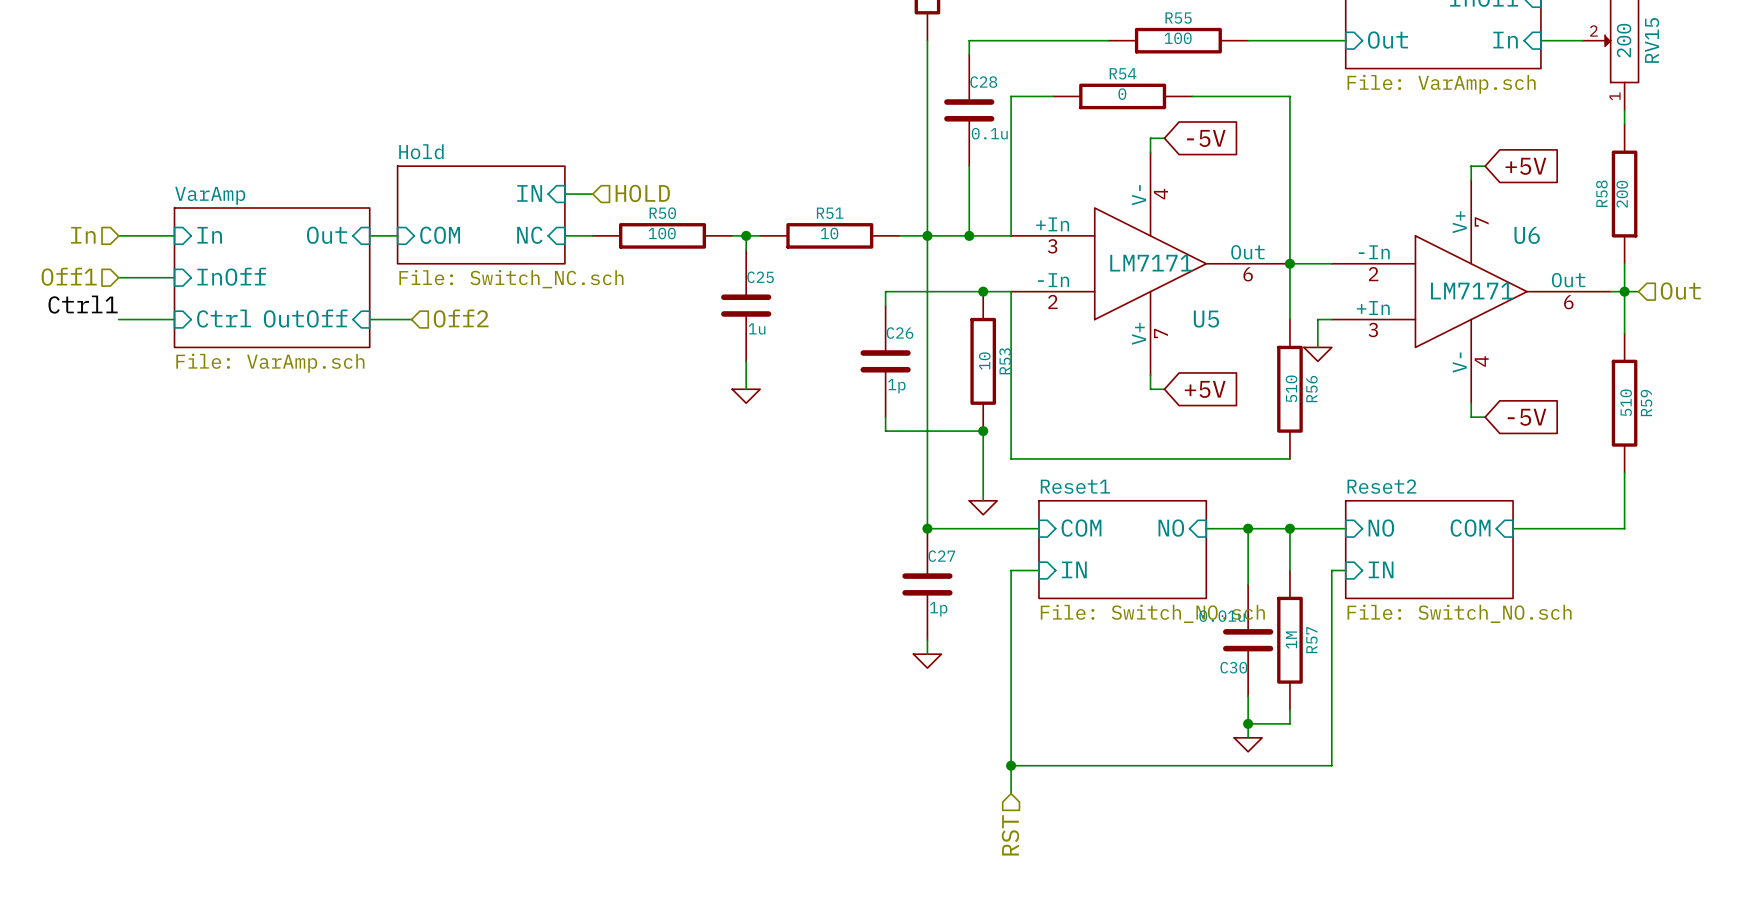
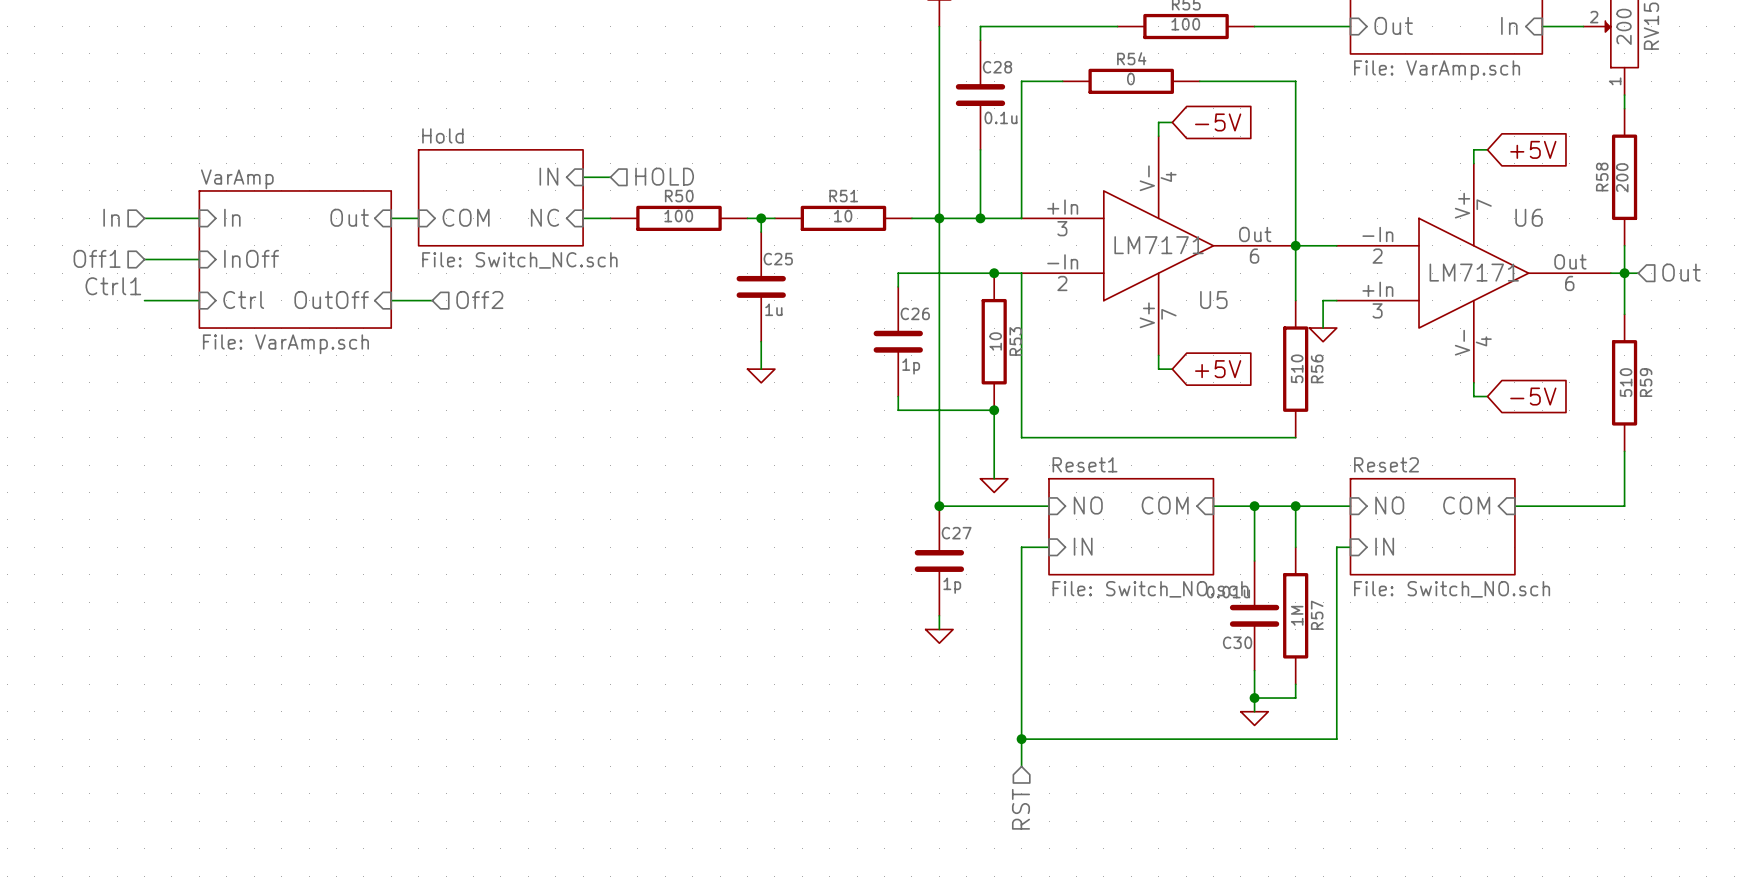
sheet pin: COM (1081, 528) -> NO (1088, 505)
sheet pin: NO (1171, 528) -> COM (1165, 505)

